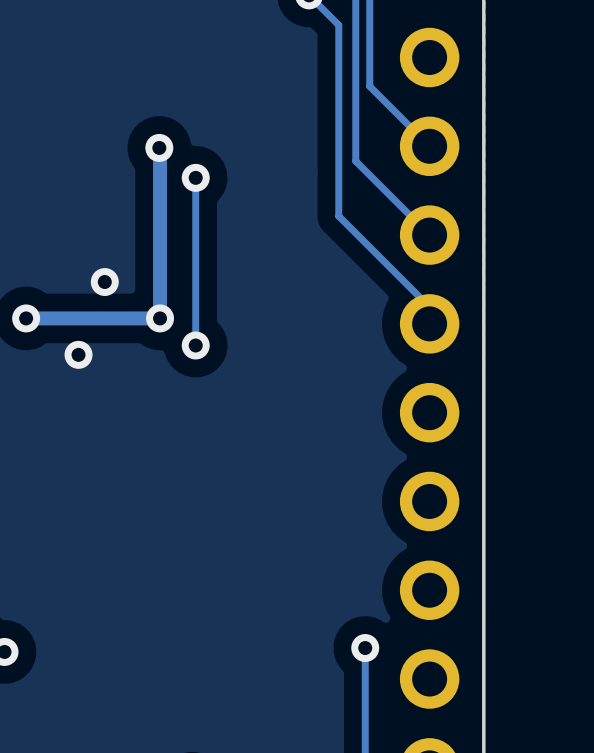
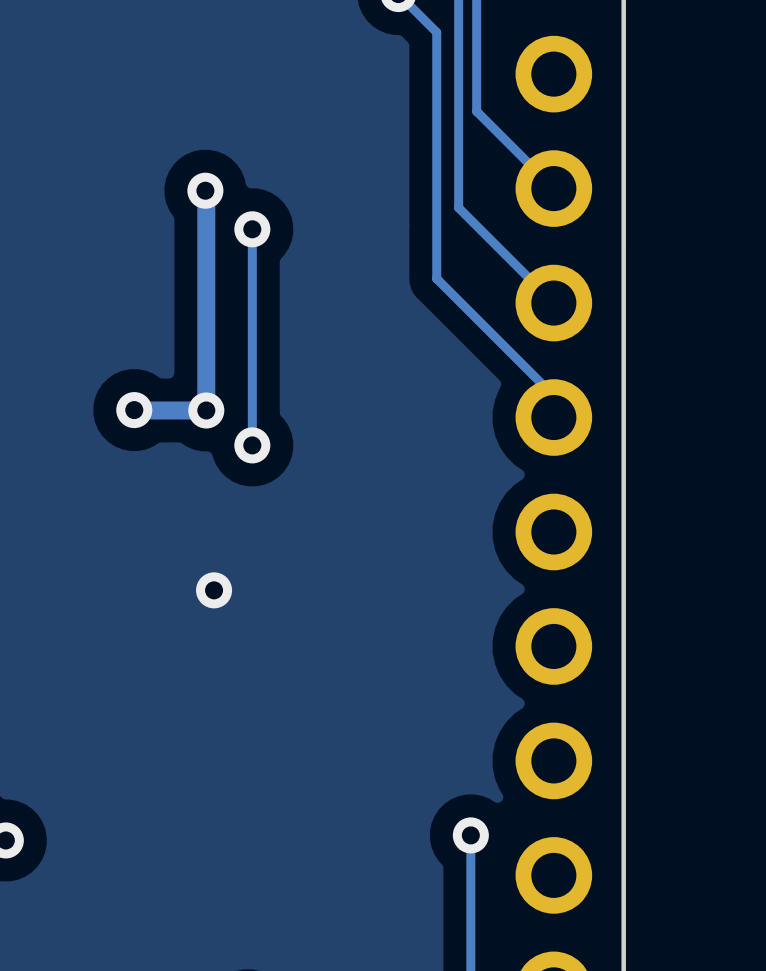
via: (104, 282) -> none
via: (26, 318) -> none
track: (104, 318) (26, 318) -> none
via: none -> (134, 410)
via: (78, 354) -> none
via: none -> (214, 590)

